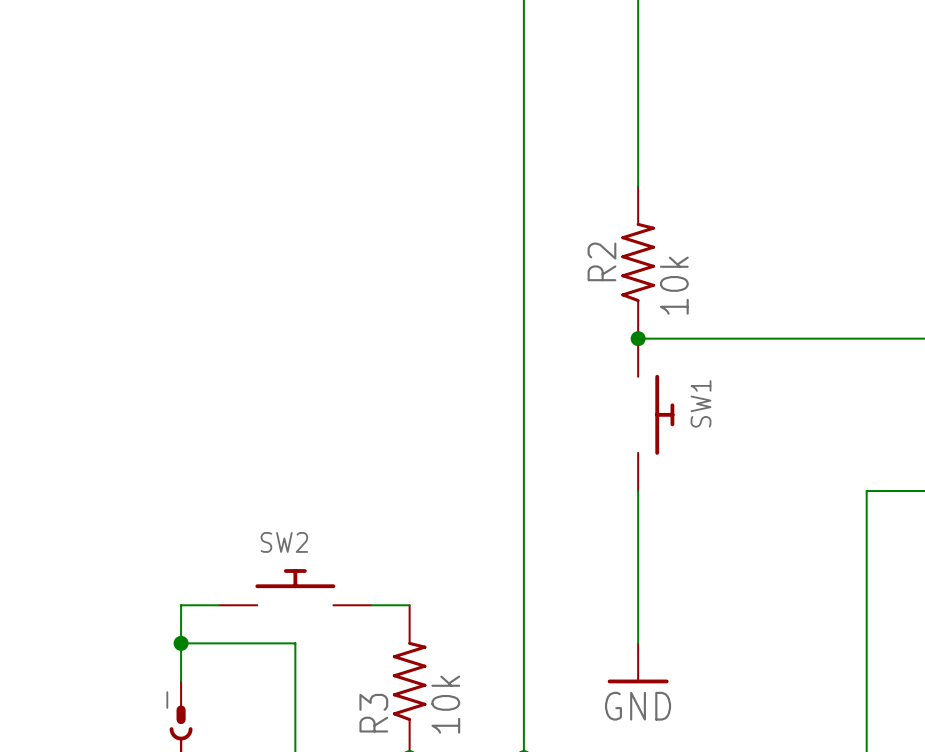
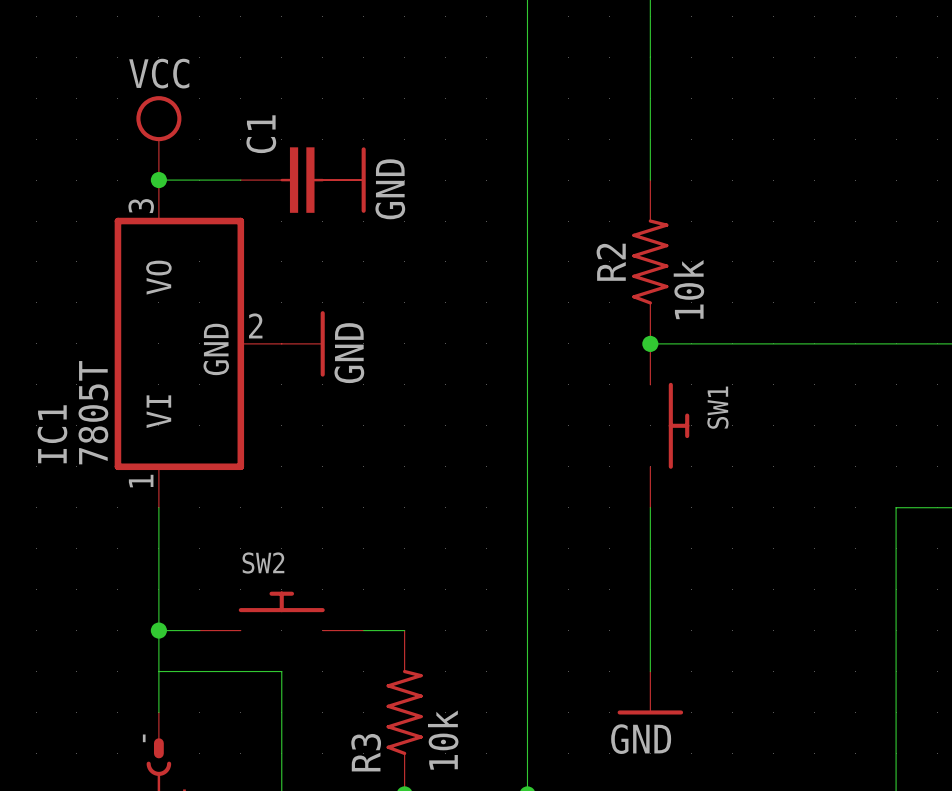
power symbol: none -> VCC (158, 138)
wire: none -> (158, 180) (240, 180)
junction: none -> (158, 180)
C1: none -> (302, 180)
power symbol: none -> GND (344, 180)
IC1: none -> 7805T (198, 343)
power symbol: none -> GND (303, 343)
wire: none -> (158, 507) (158, 630)
junction position: (181, 643) -> (158, 630)

